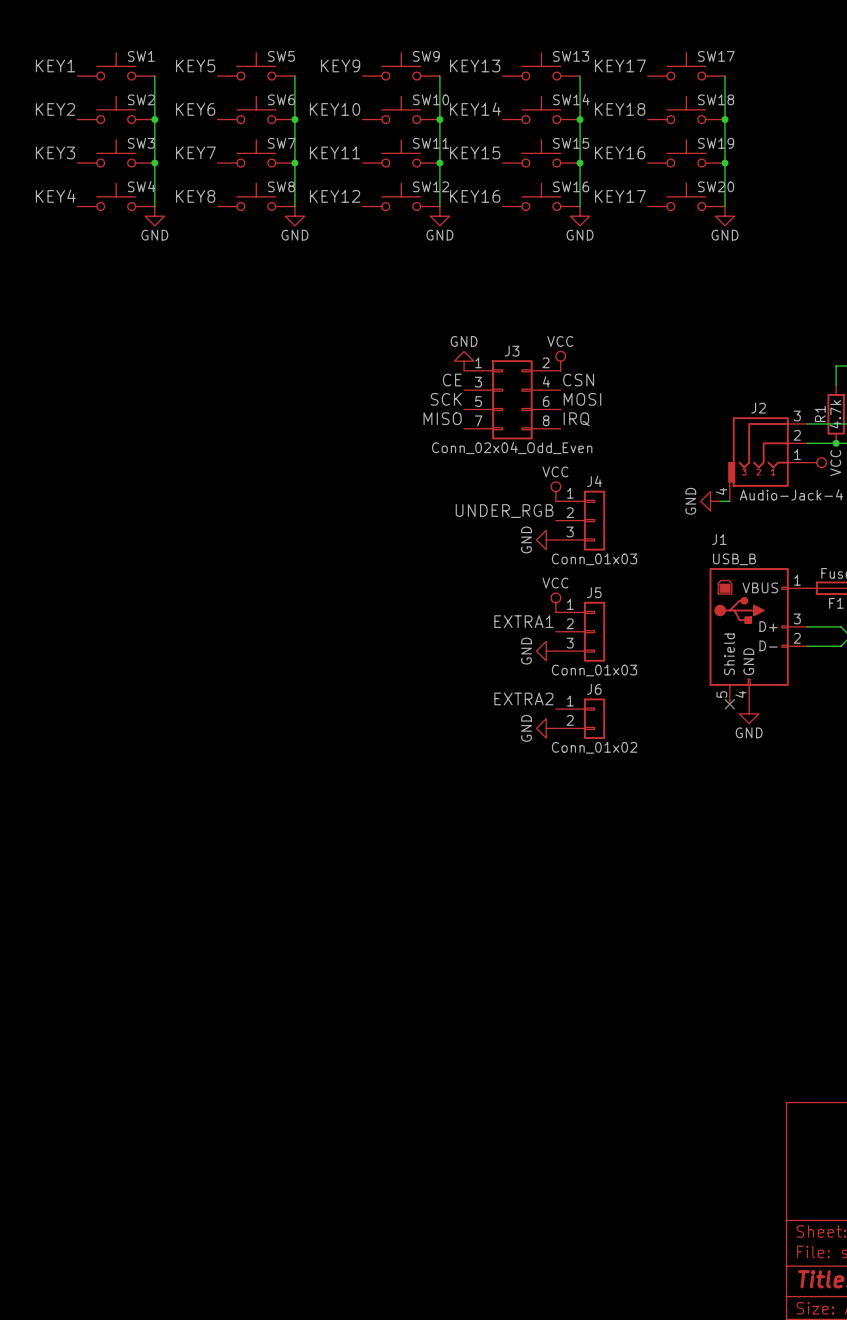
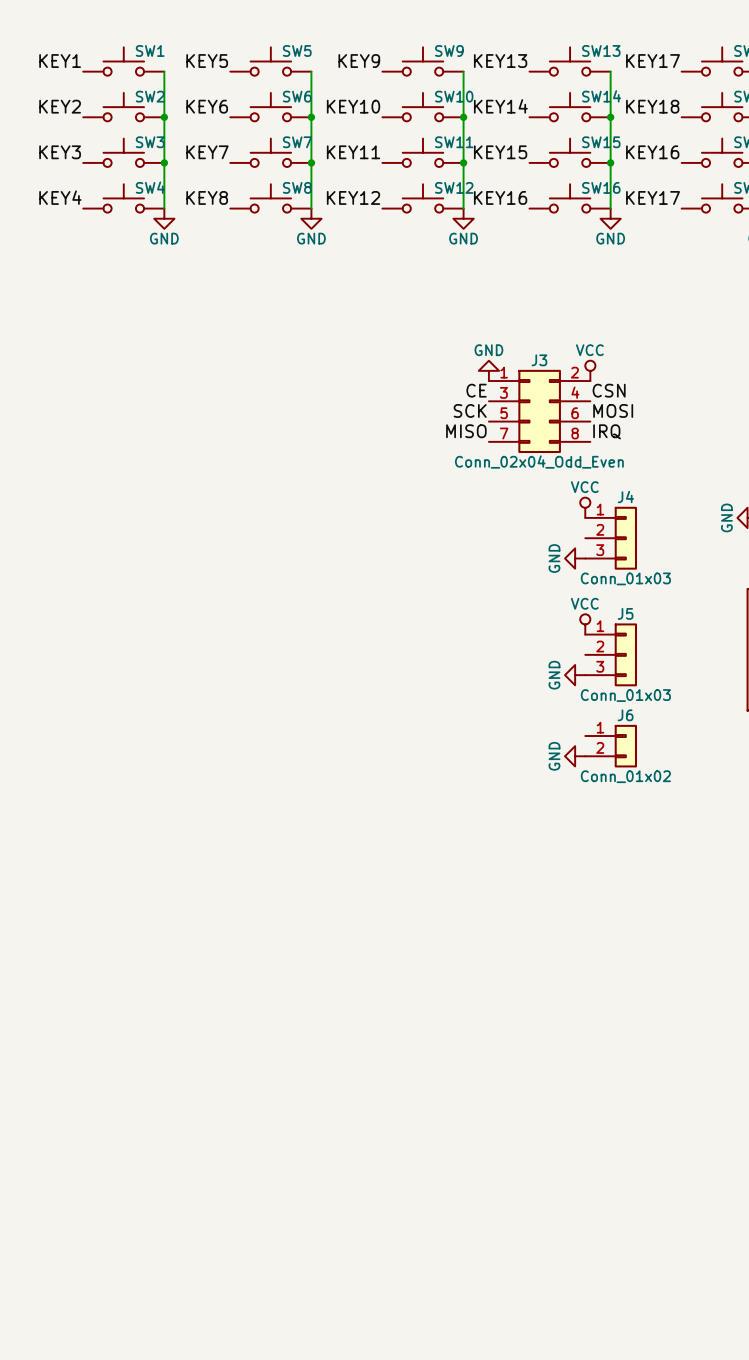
label: UNDER_RGB (504, 511) -> none
label: EXTRA1 (523, 621) -> none
label: EXTRA2 (523, 698) -> none

